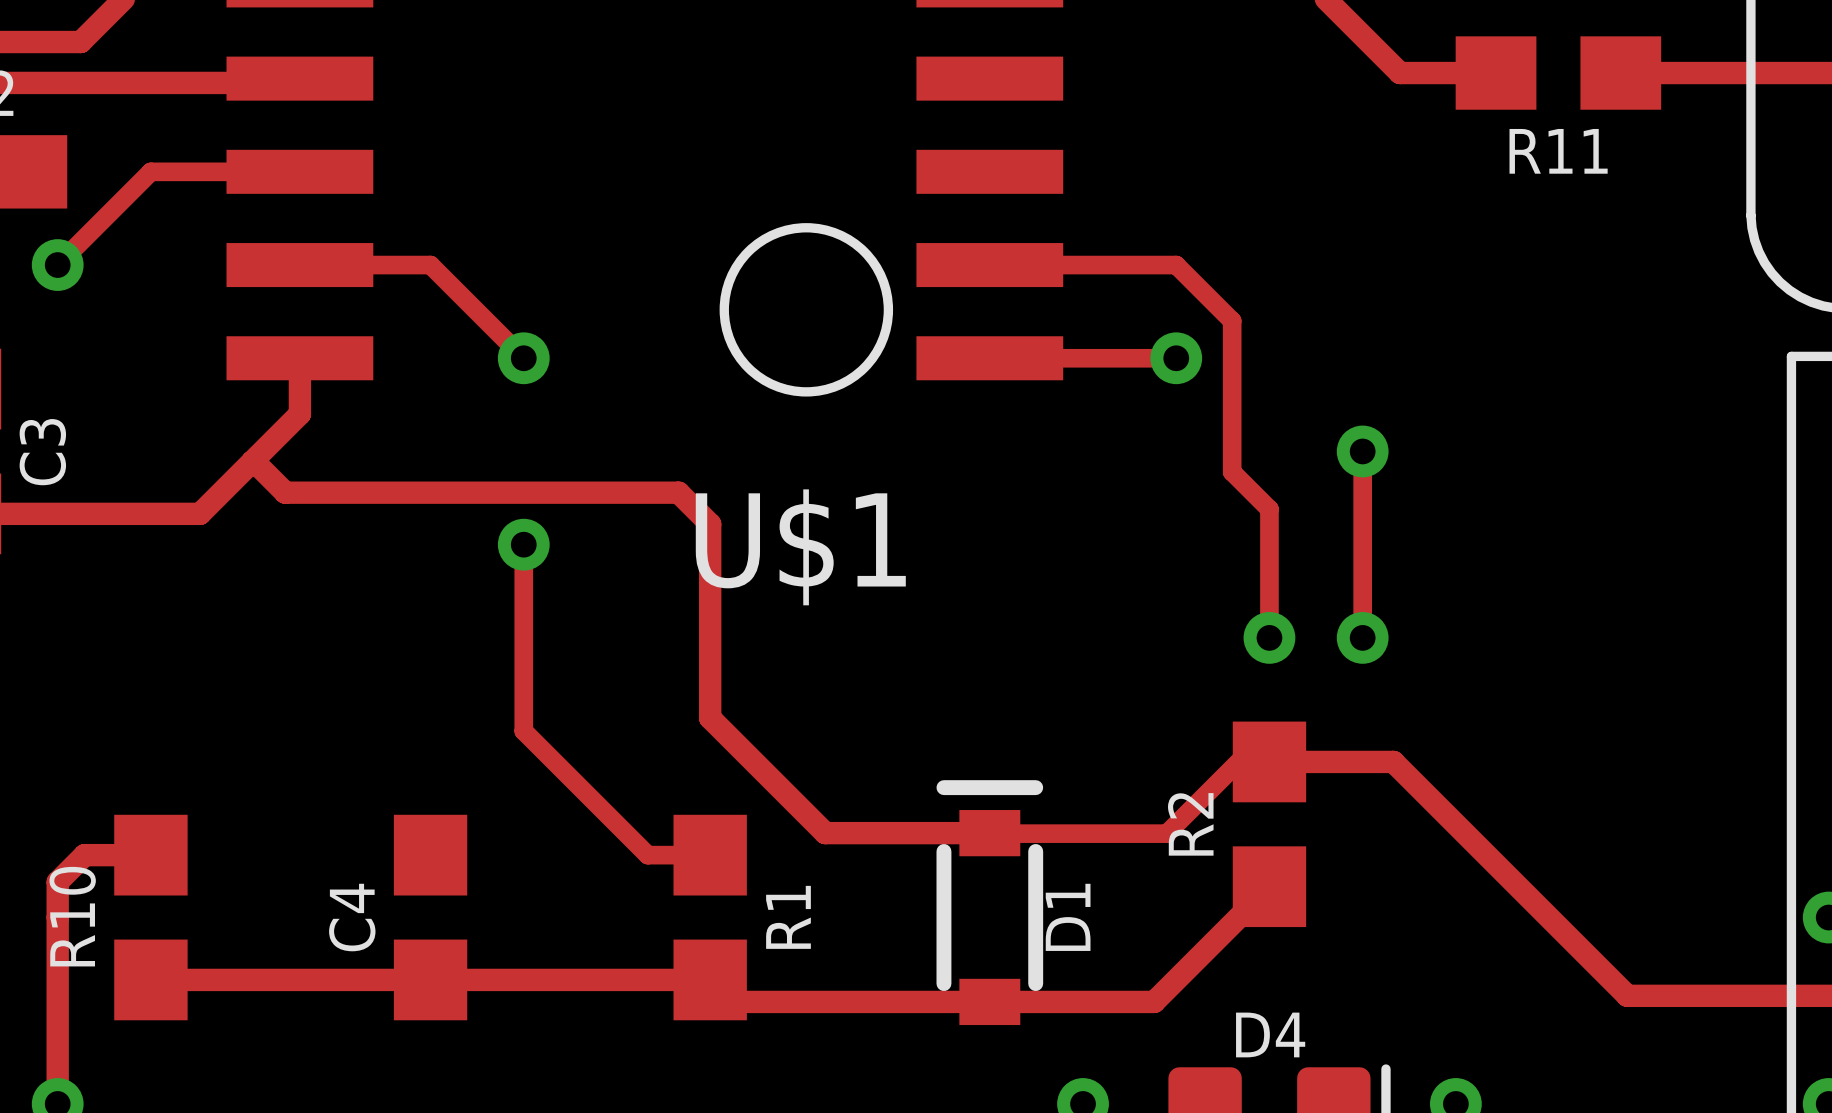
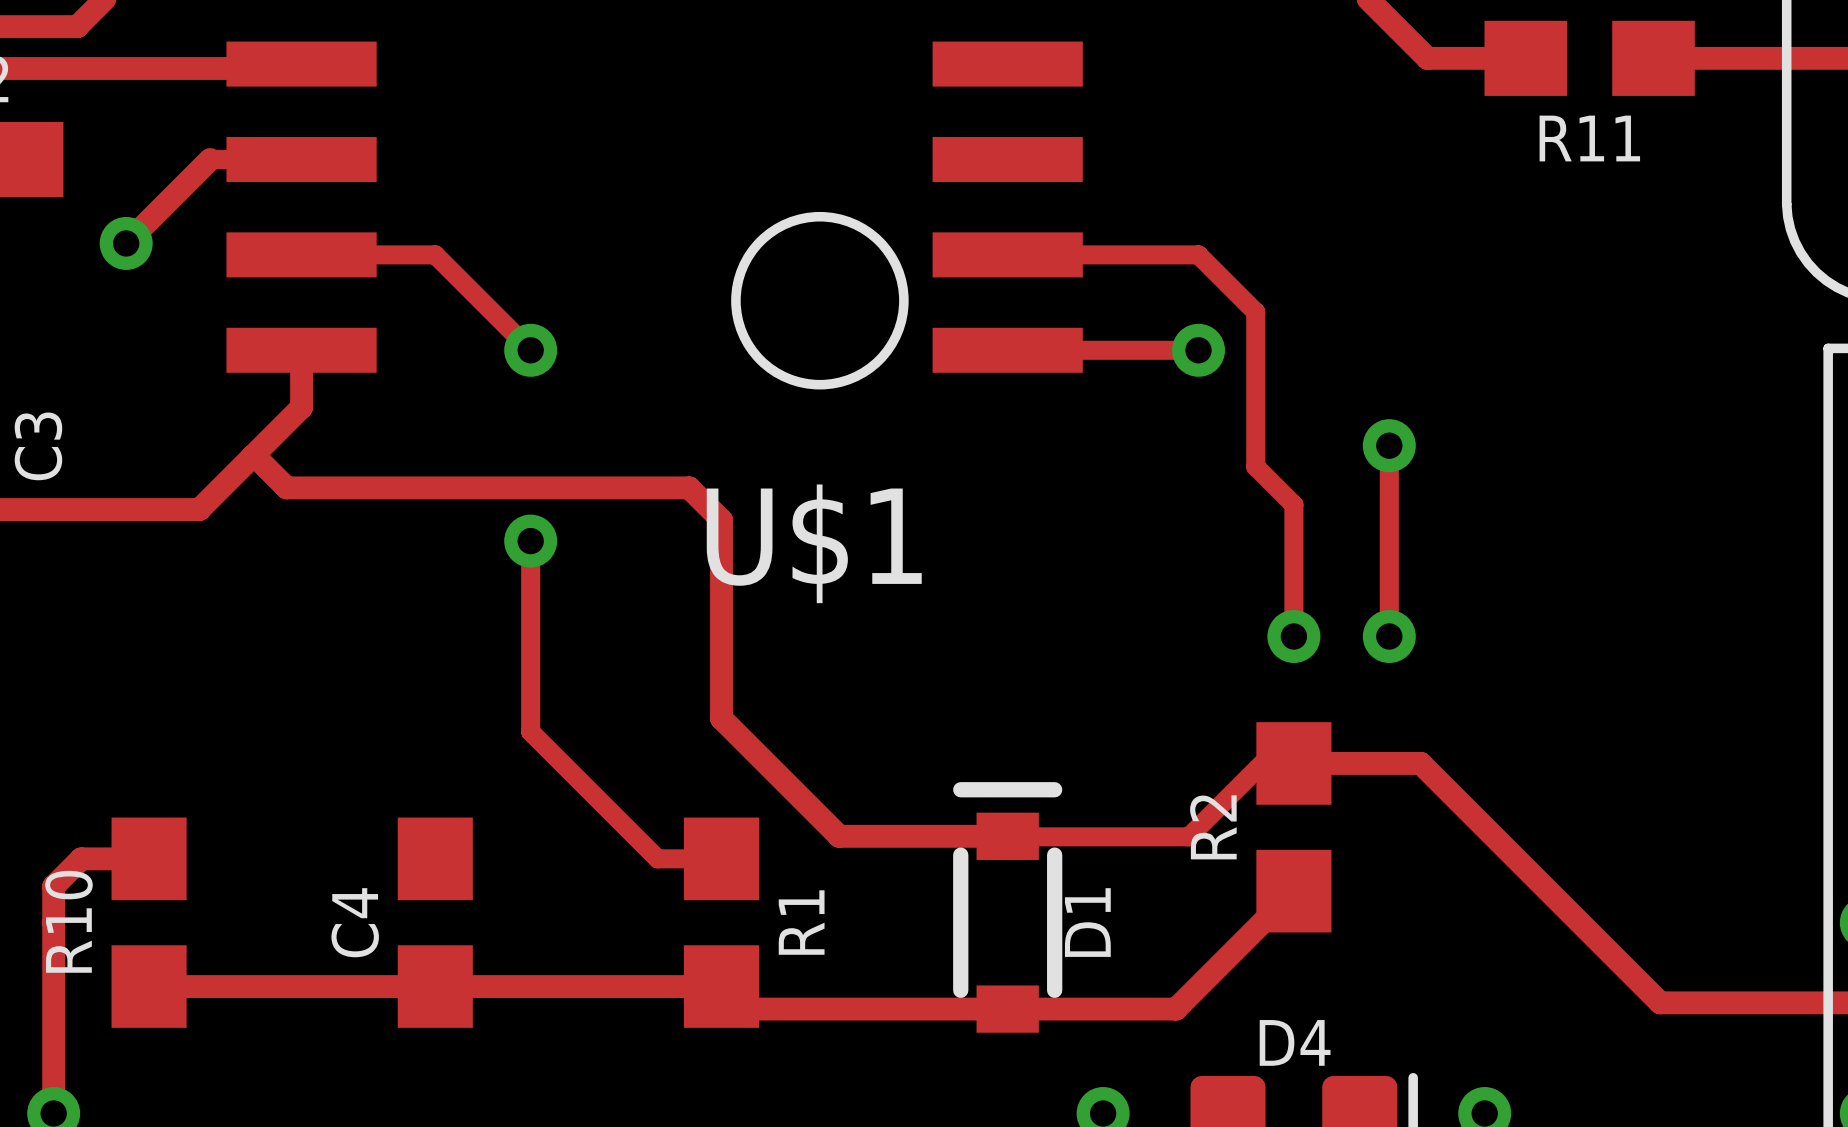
track: (210, 171) (150, 171) (57, 265) -> (210, 159) (126, 243)
via position: (57, 265) -> (126, 243)

